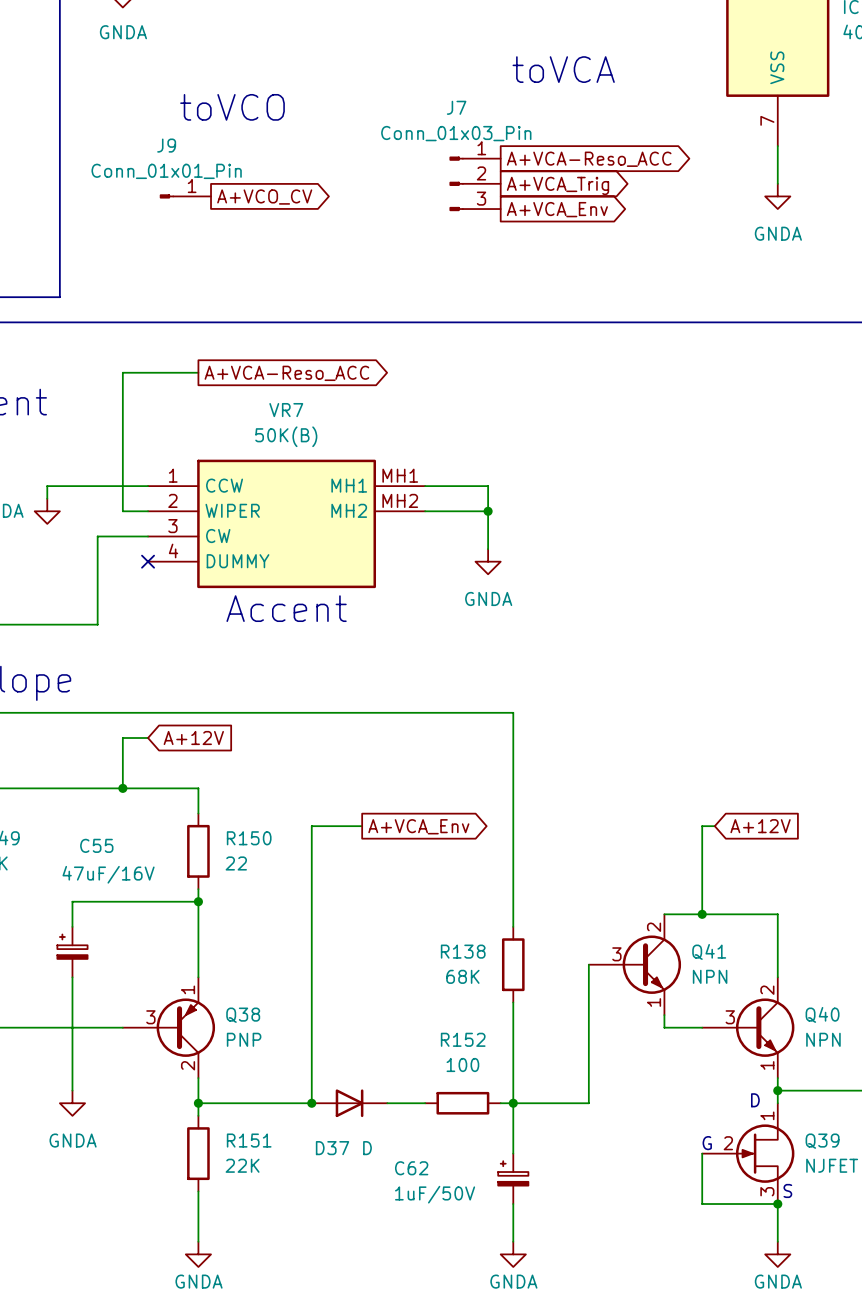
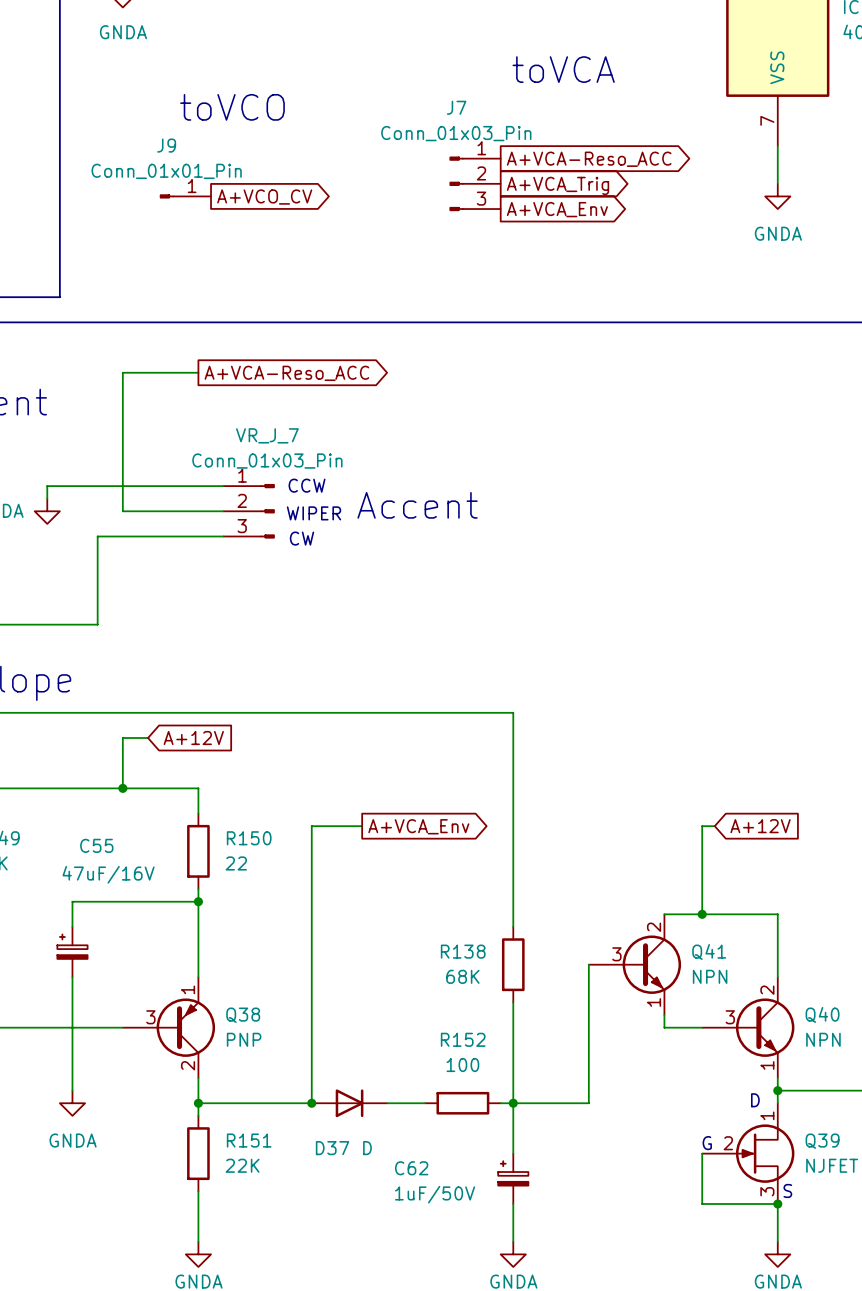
text: none -> CCW (307, 485)
wire: (425, 486) (488, 486) (488, 549) -> none
VR_J_7: none -> Conn_01x03_Pin (249, 511)
wire: (425, 511) (488, 511) -> none
junction: (488, 511) -> none
text: none -> WIPER (313, 513)
VR7: 50K(B) (286, 523) -> none
text: none -> CW (302, 538)
no-connect mark: (148, 561) -> none
power symbol: GNDA (488, 561) -> none
text position: Accent (286, 608) -> Accent (417, 505)

